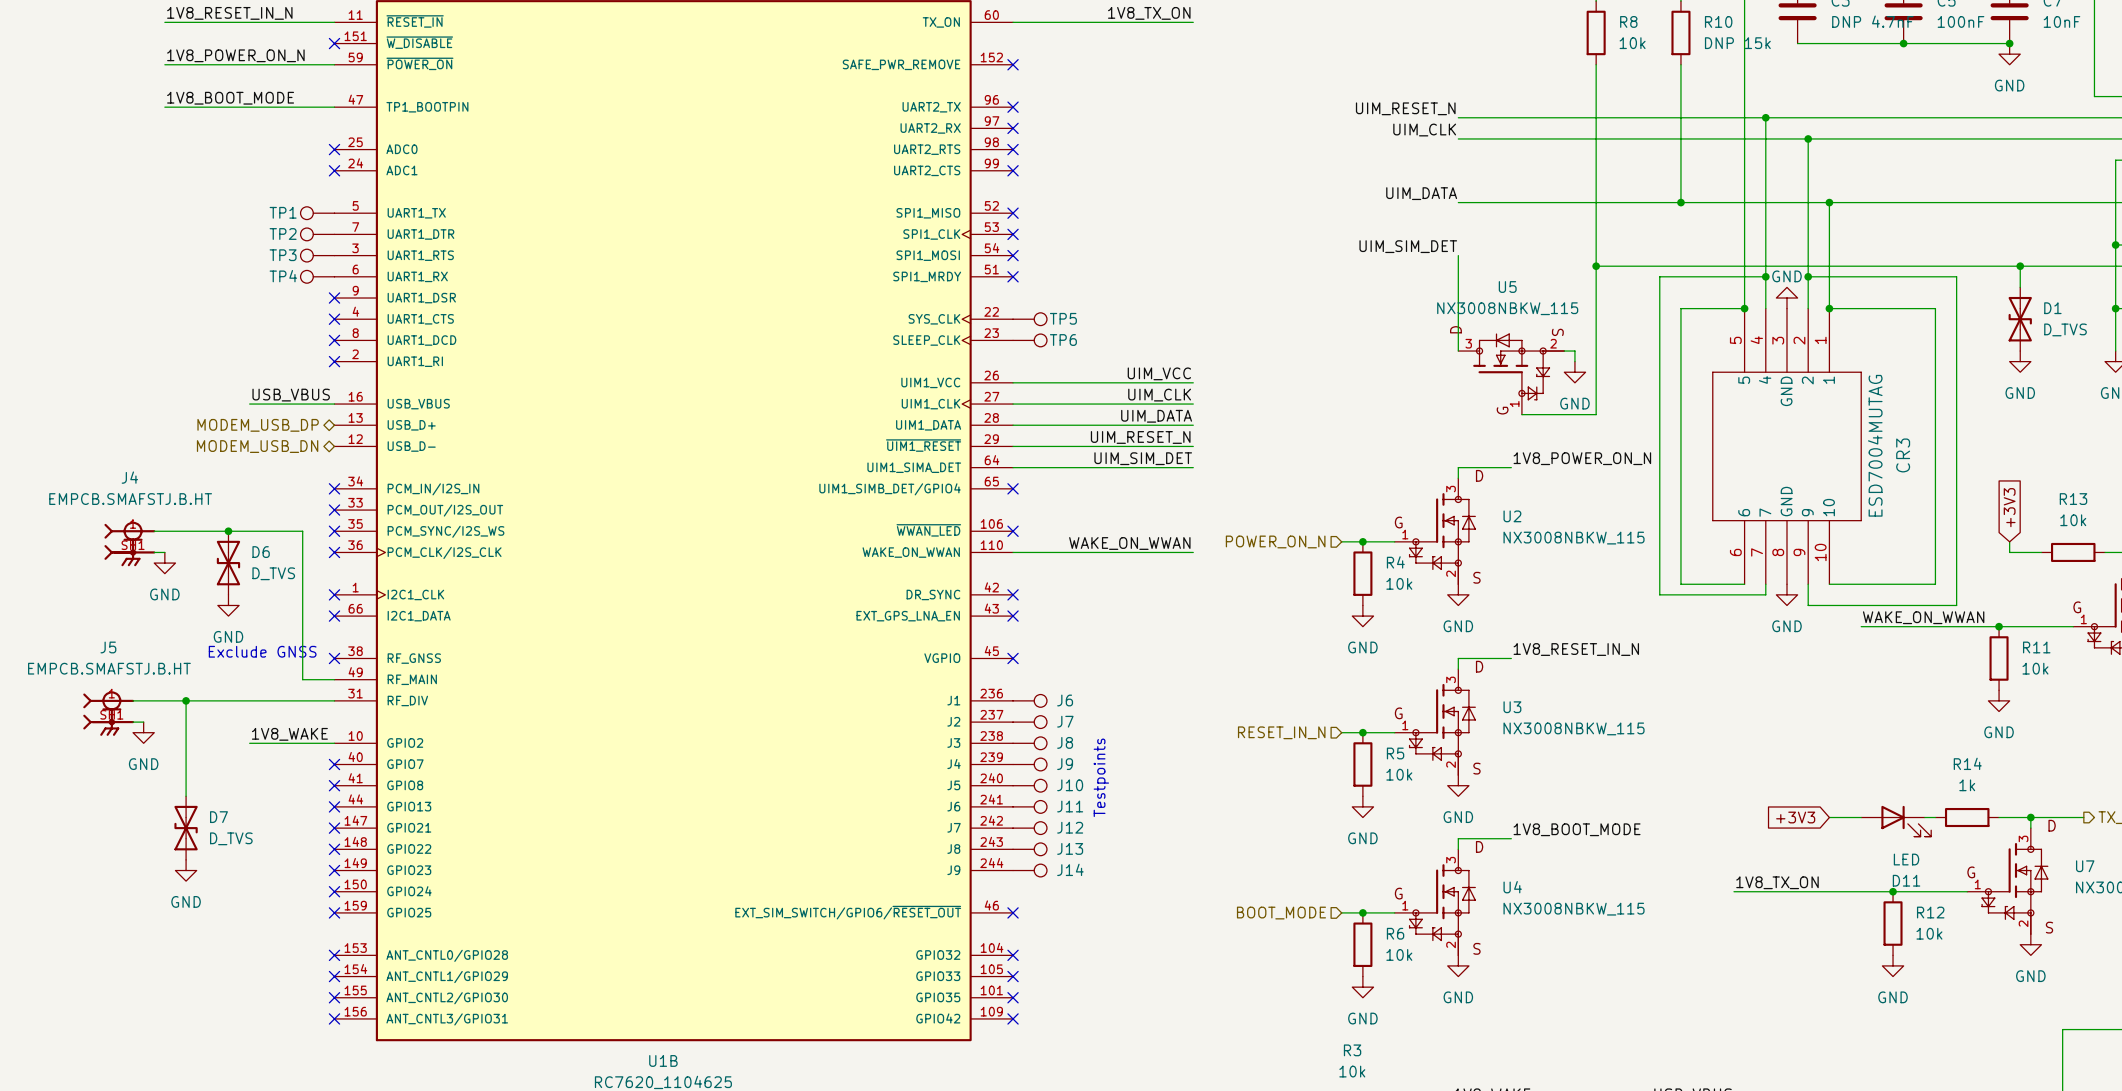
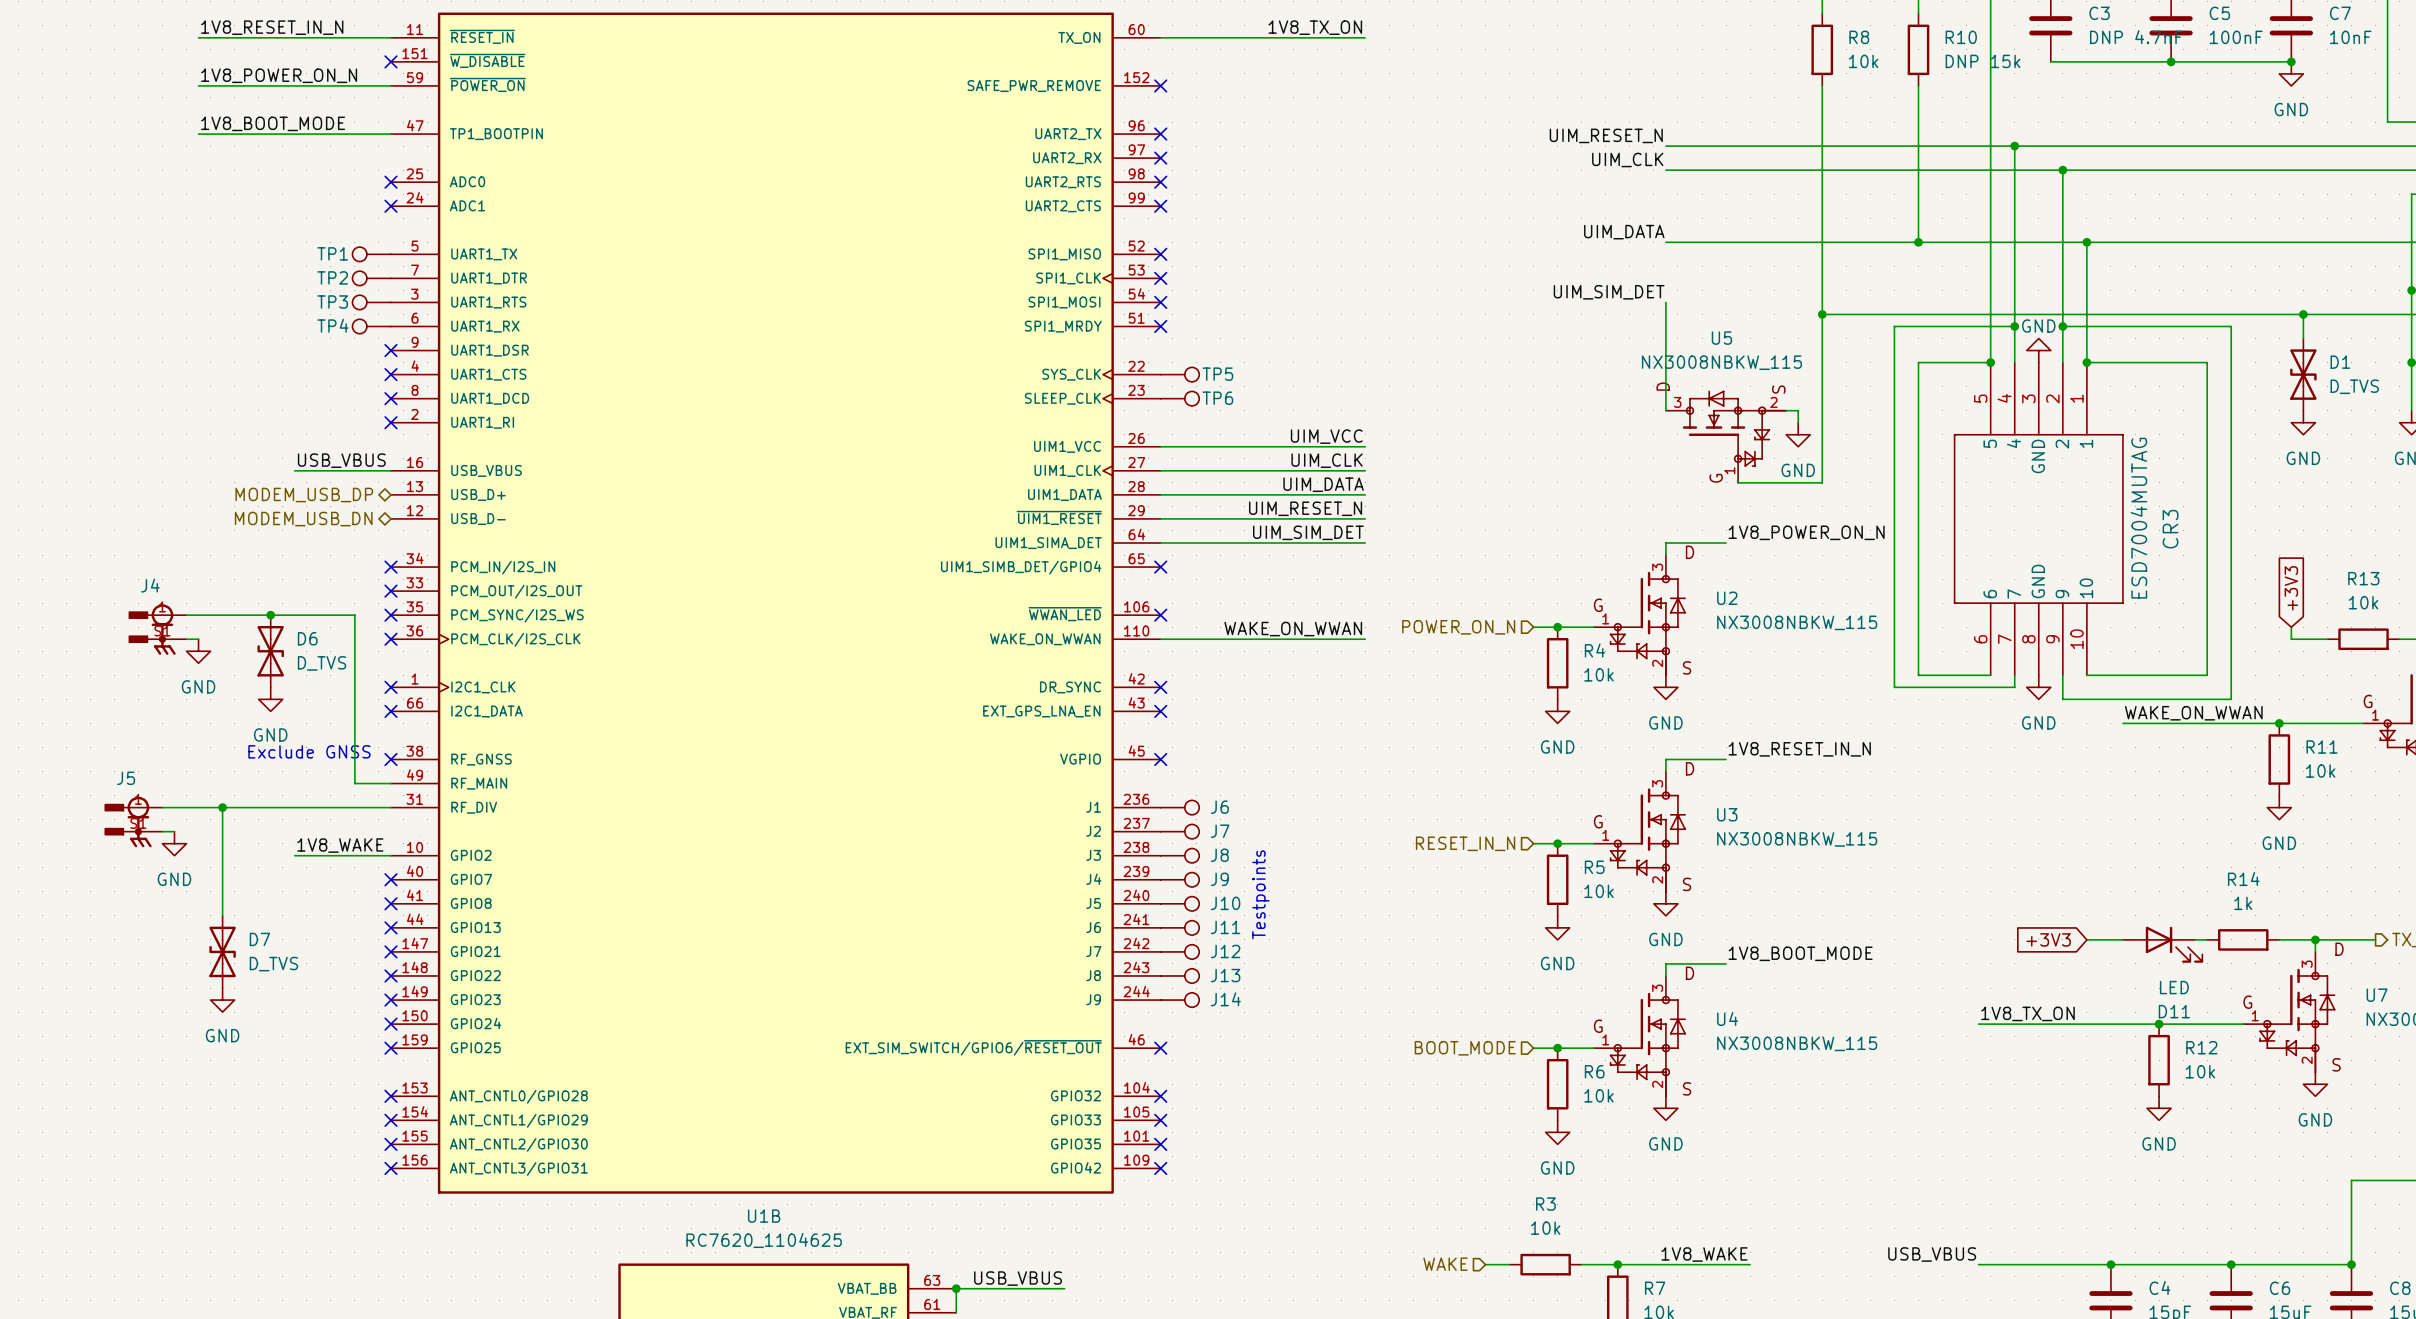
J4 name position: J4 (129, 477) -> J4 (150, 585)
J4 value: EMPCB.SMAFSTJ.B.HT (130, 499) -> none
J4 symbol: [104, 521, 156, 567] -> [128, 604, 187, 655]
J5 name position: J5 (108, 647) -> J5 (126, 778)
J5 value: EMPCB.SMAFSTJ.B.HT (109, 668) -> none
J5 symbol: [83, 691, 135, 736] -> [104, 796, 163, 848]

